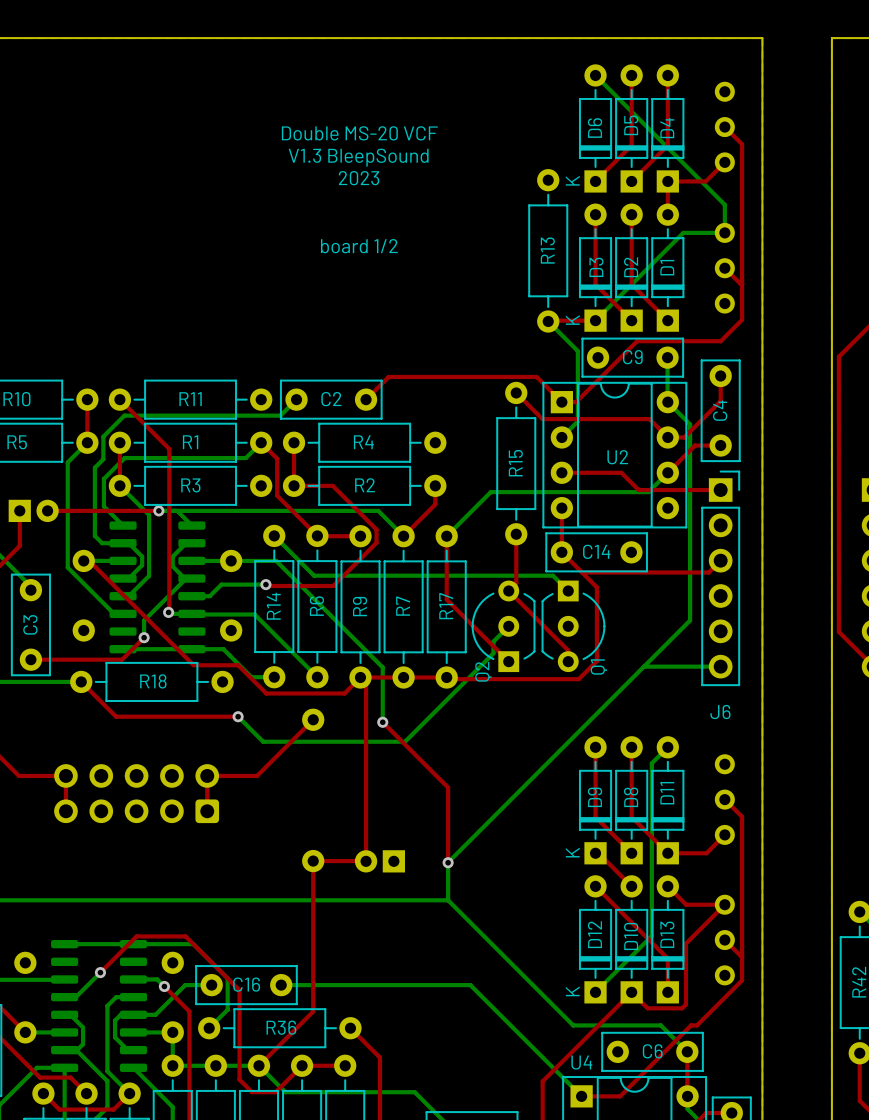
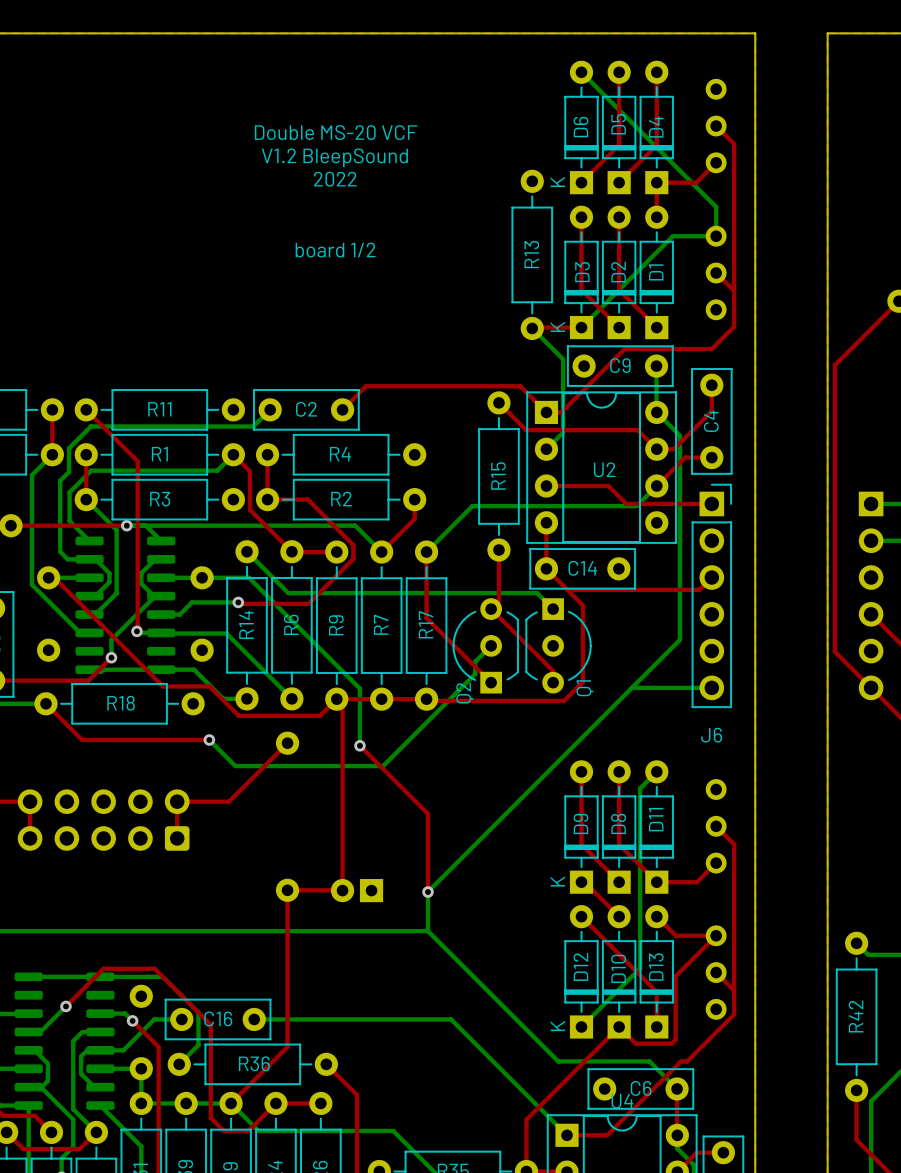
text: V1.3 BleepSound (358, 157) -> V1.2 BleepSound (334, 157)
text: 2023 (359, 178) -> 2022 (335, 179)
U4 name position: U4 (581, 1062) -> U4 (622, 1101)

